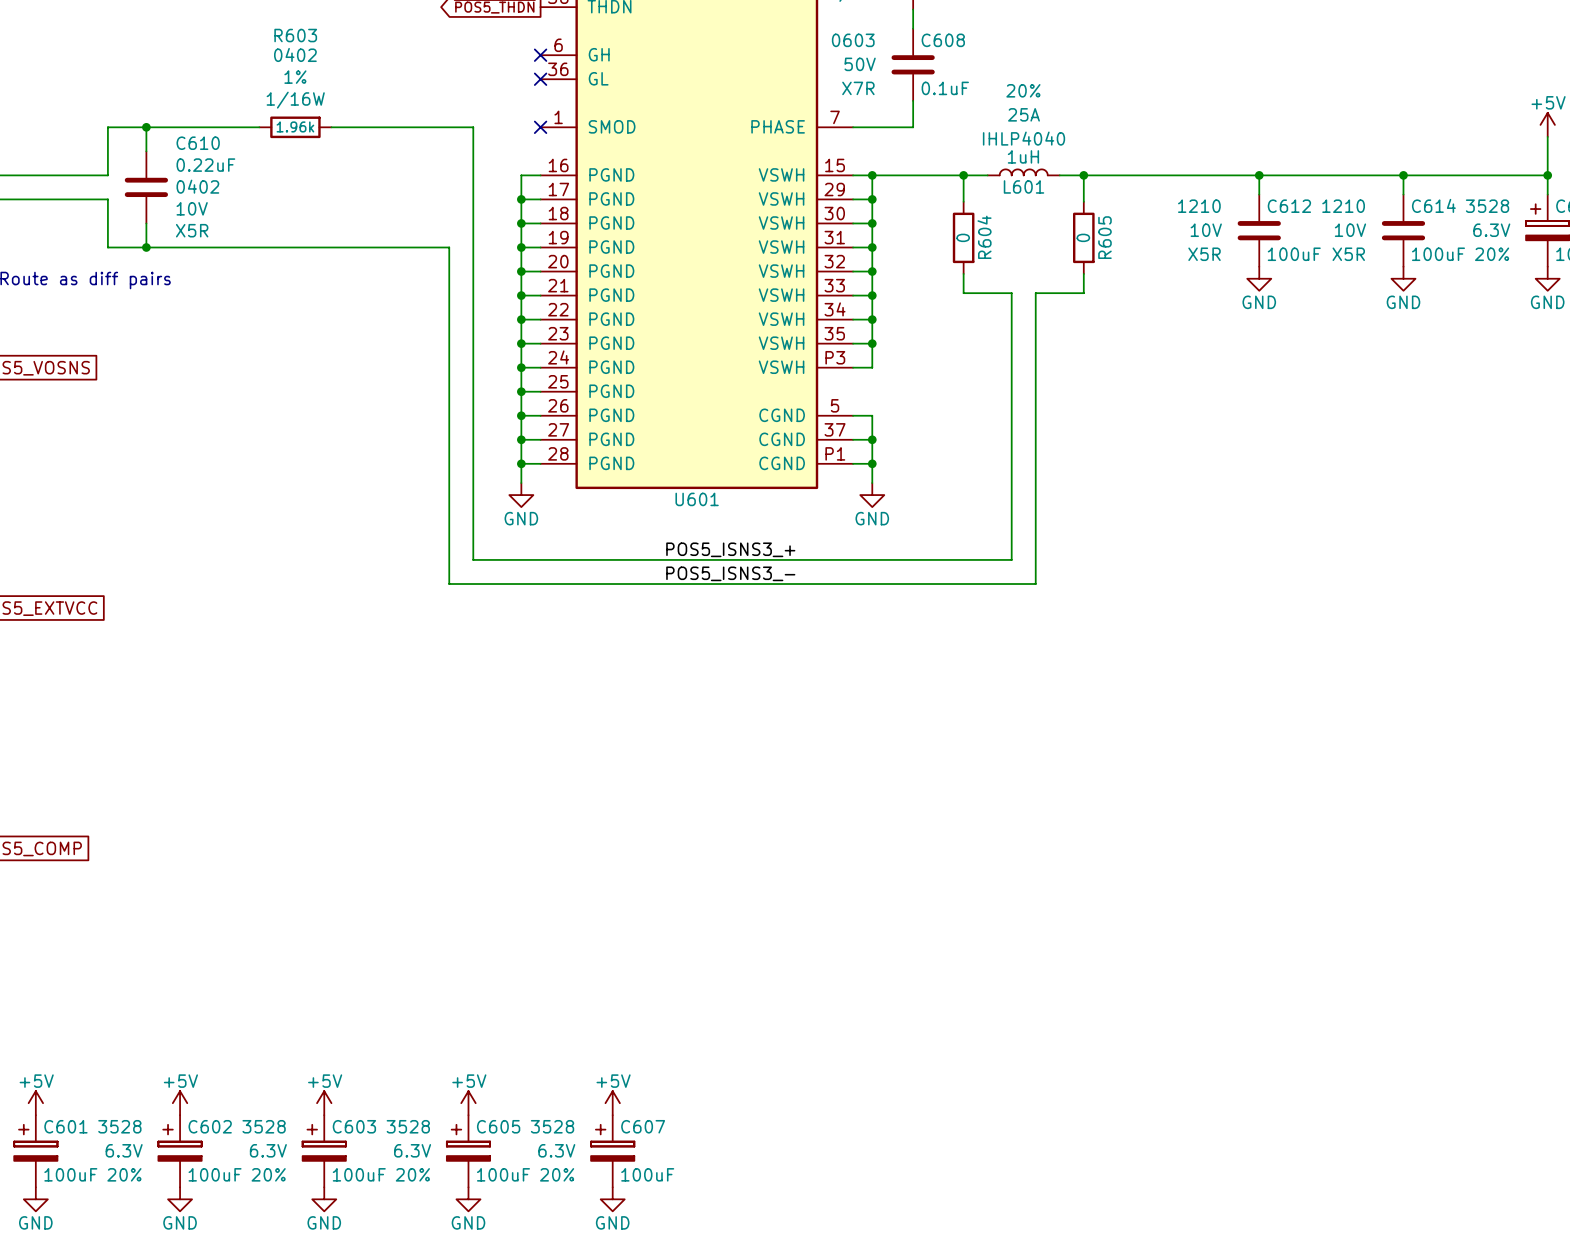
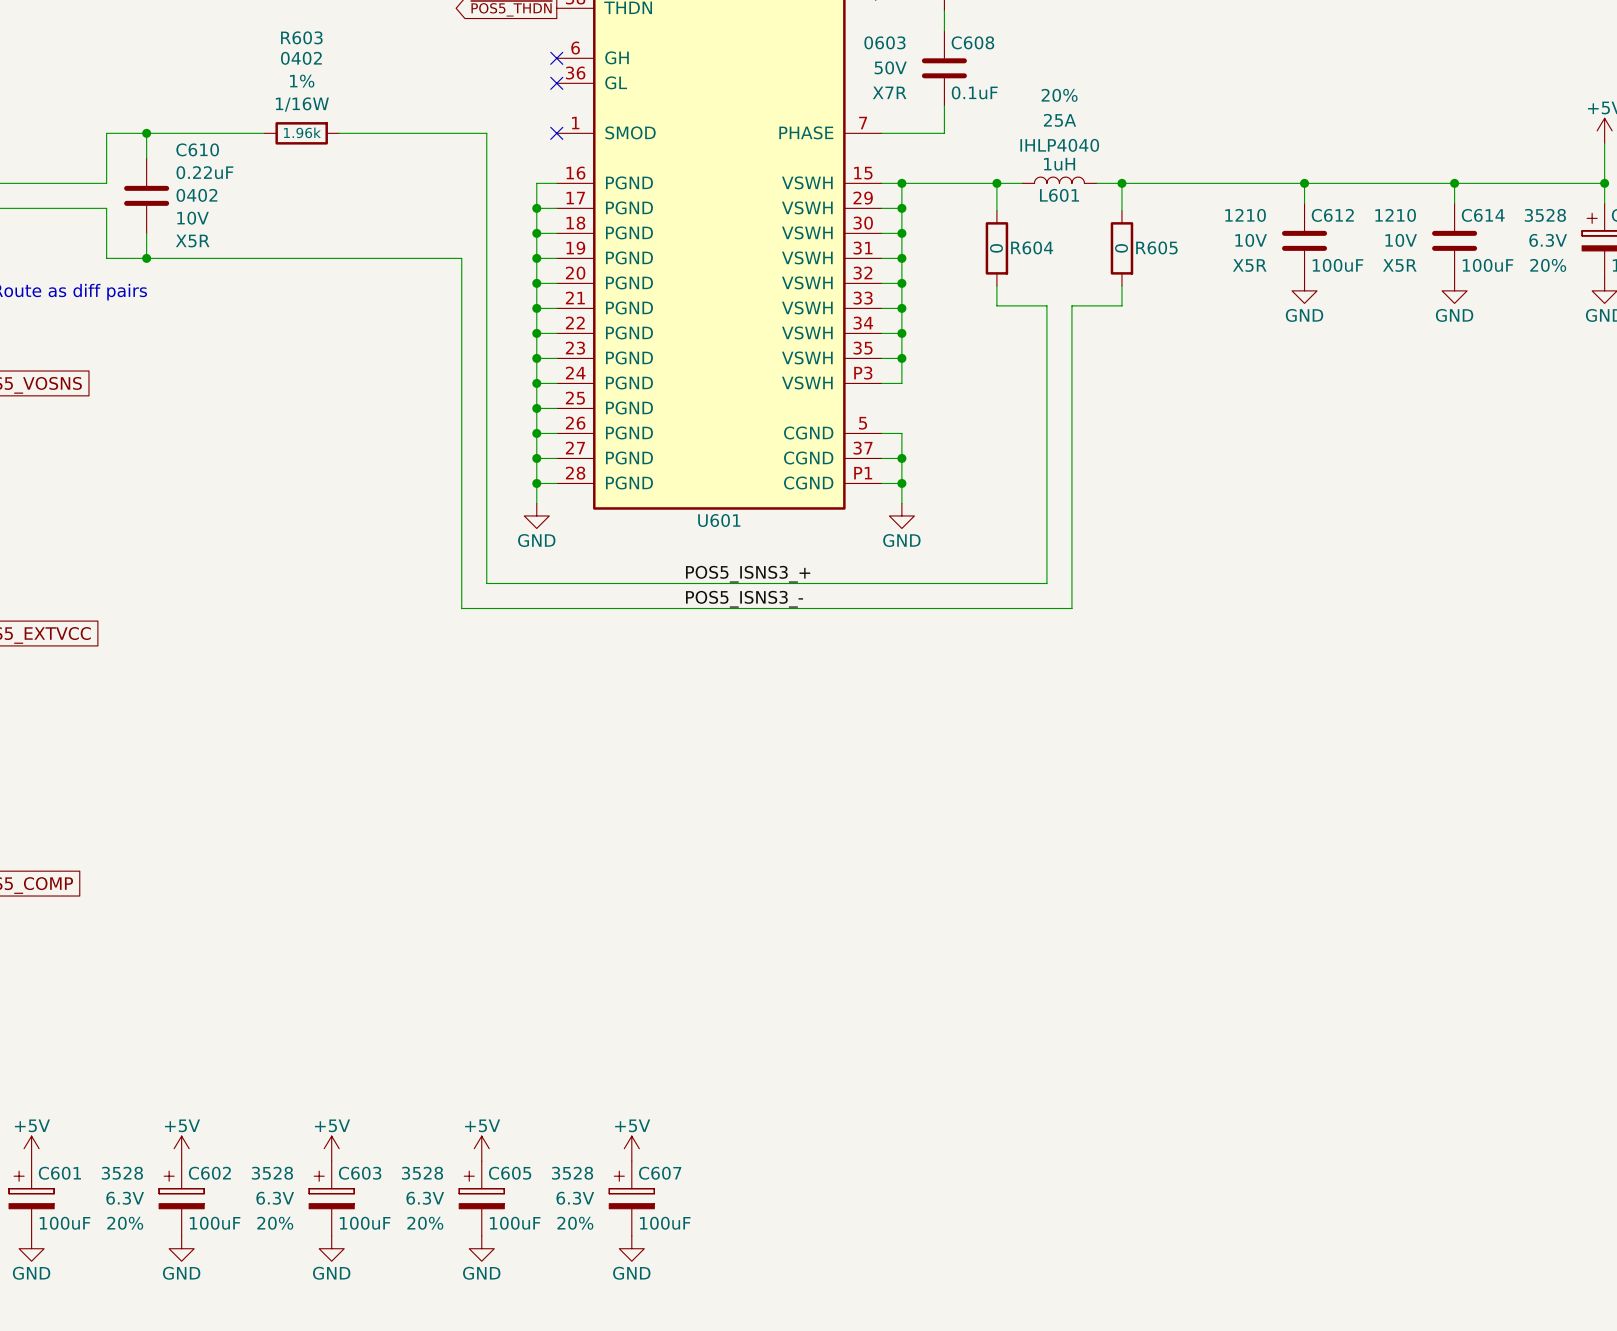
R604 name rotation: 0° (984, 237) -> 90° clockwise (1032, 247)
R605 name rotation: 0° (1104, 237) -> 90° clockwise (1156, 247)

